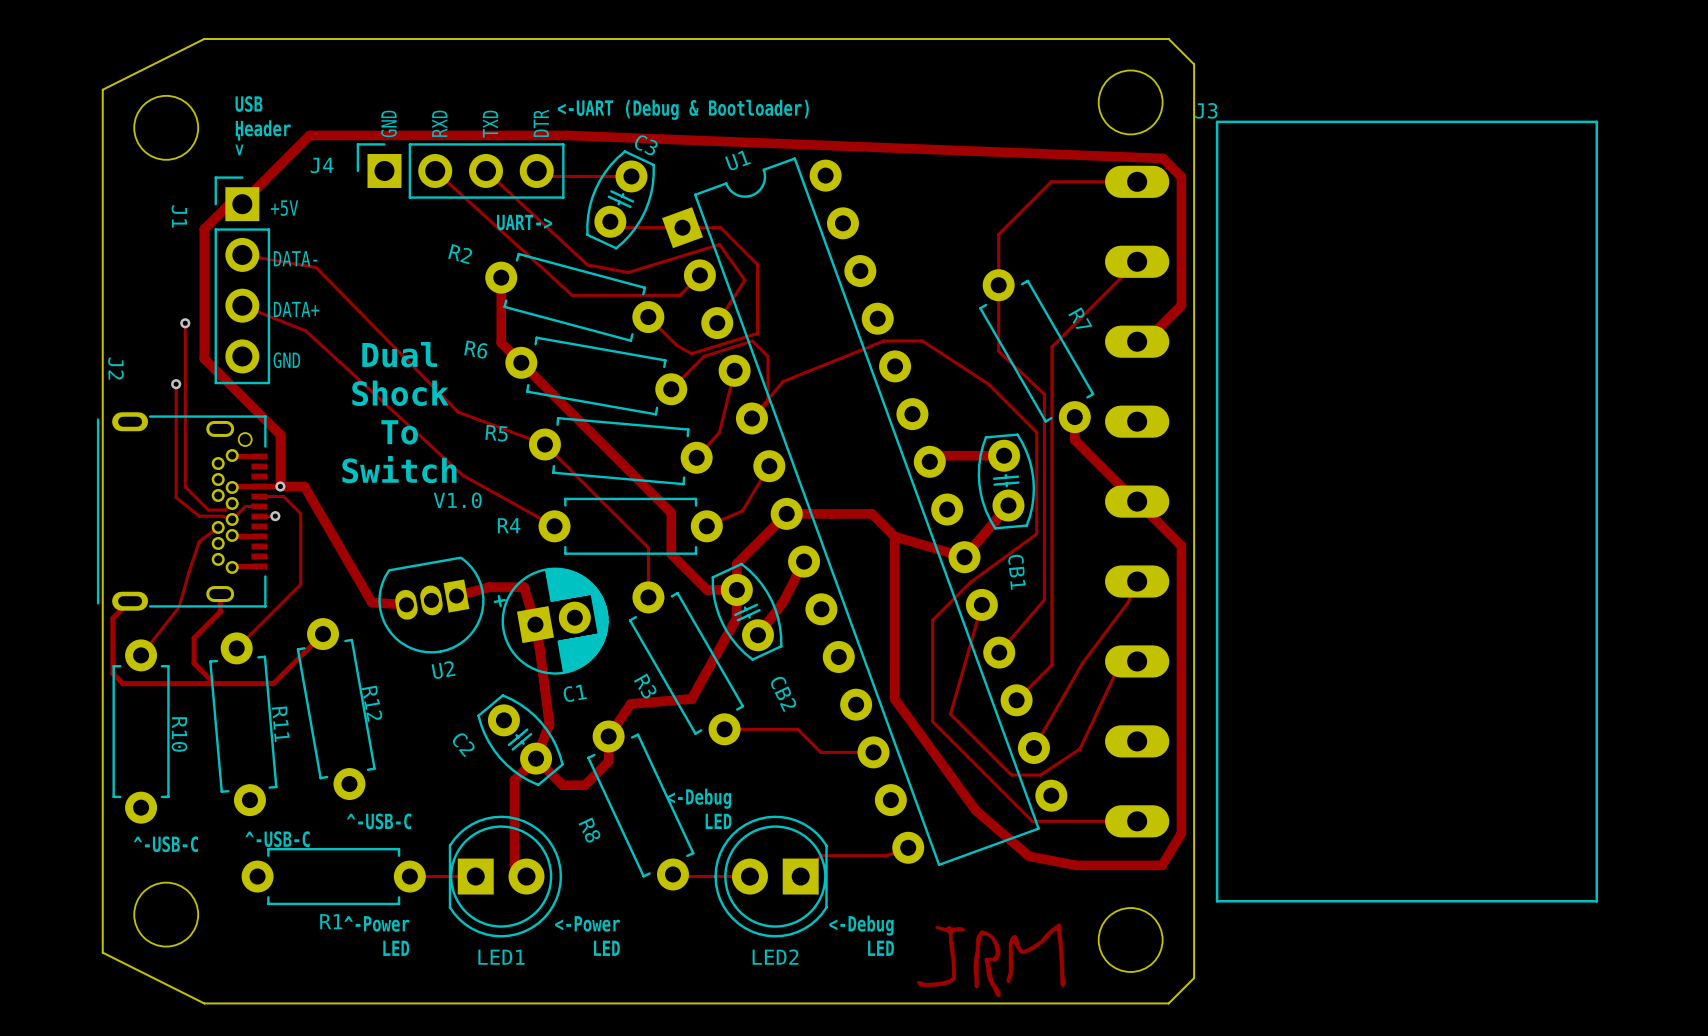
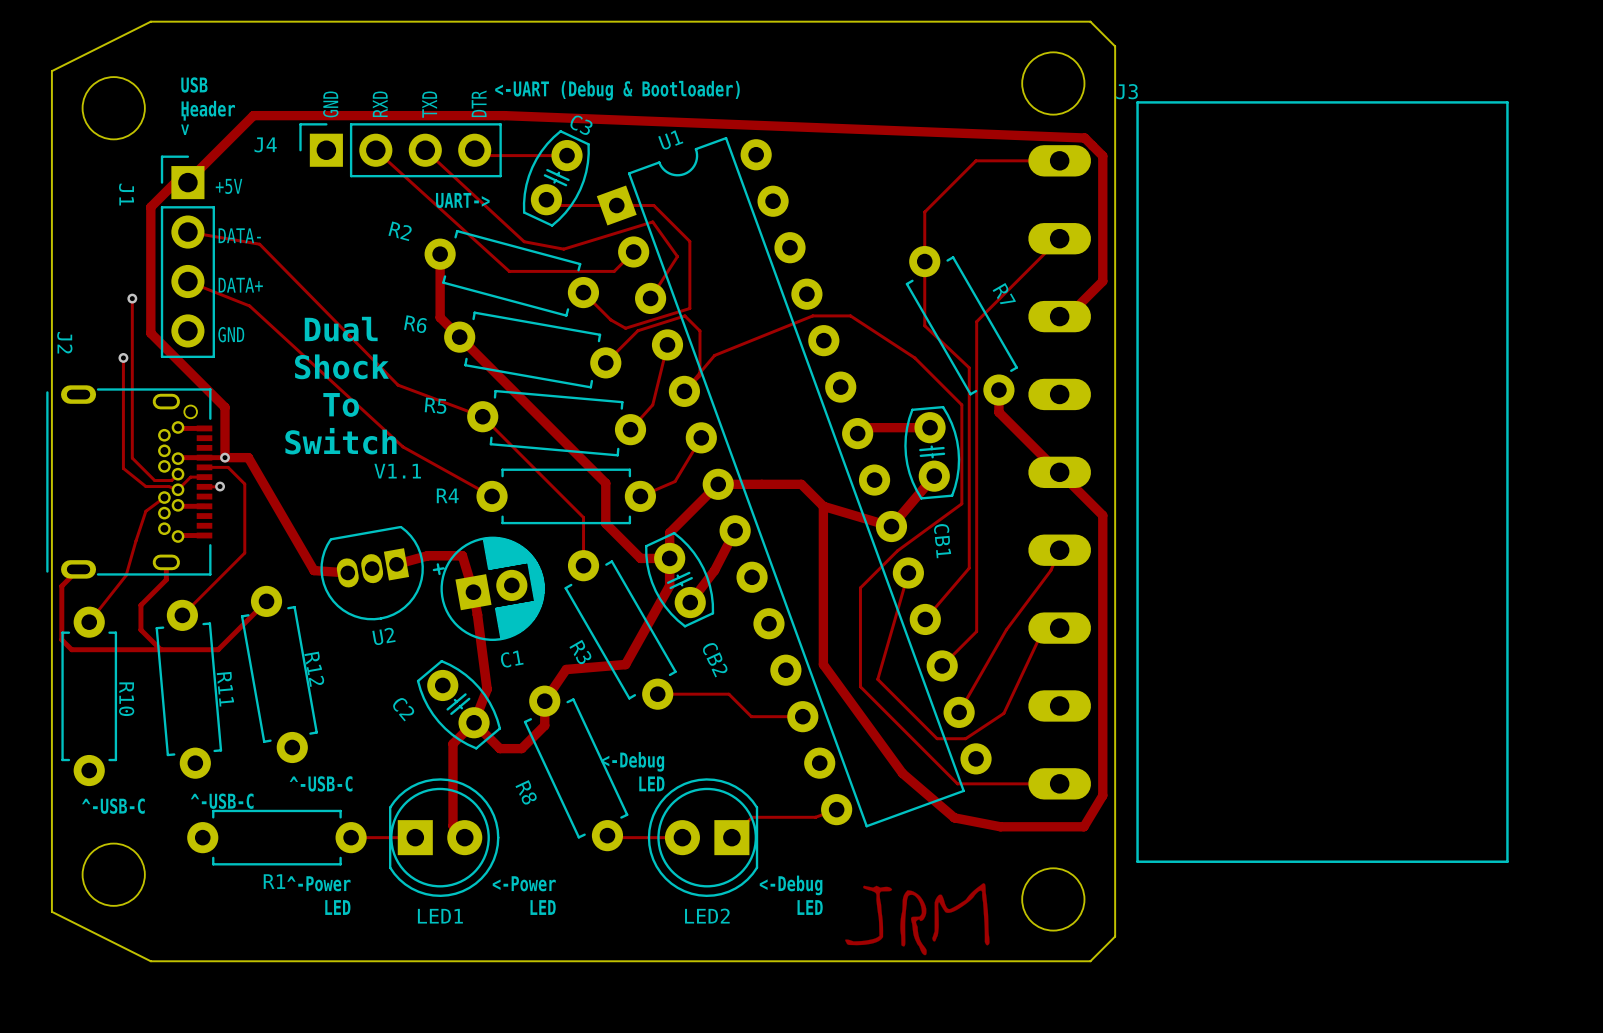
text: V1.0 (457, 500) -> V1.1 (397, 471)

